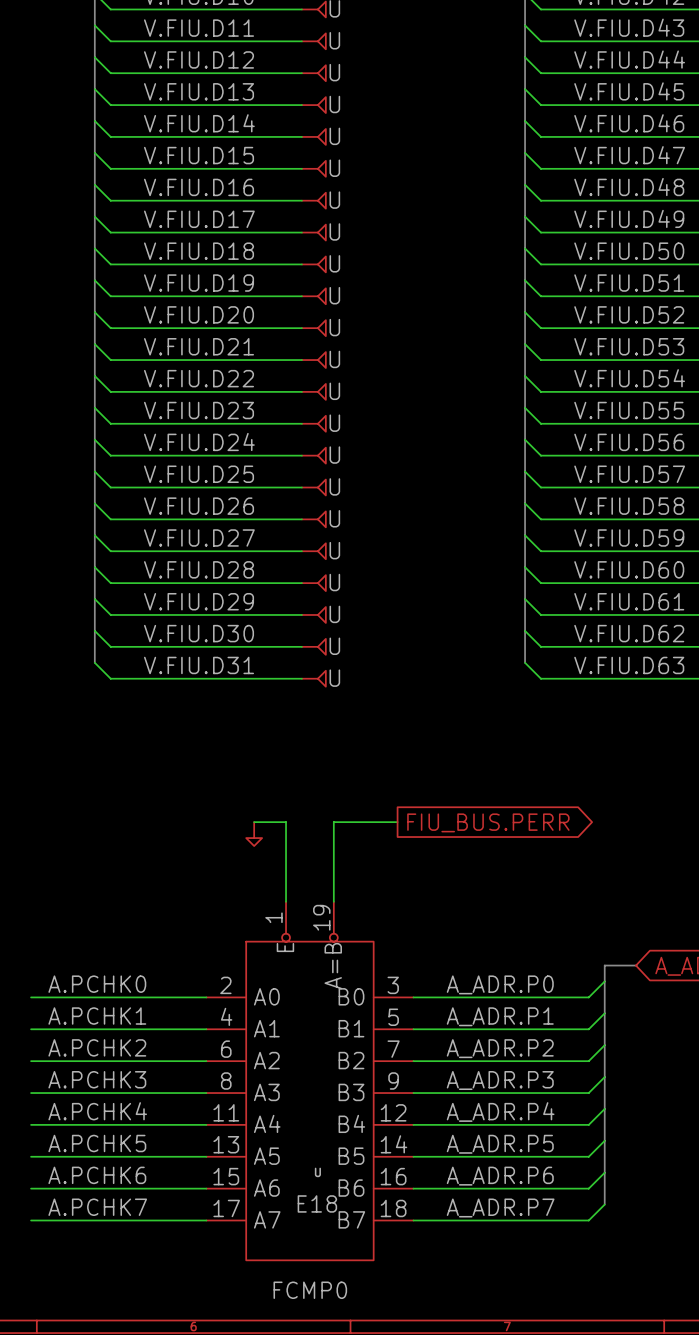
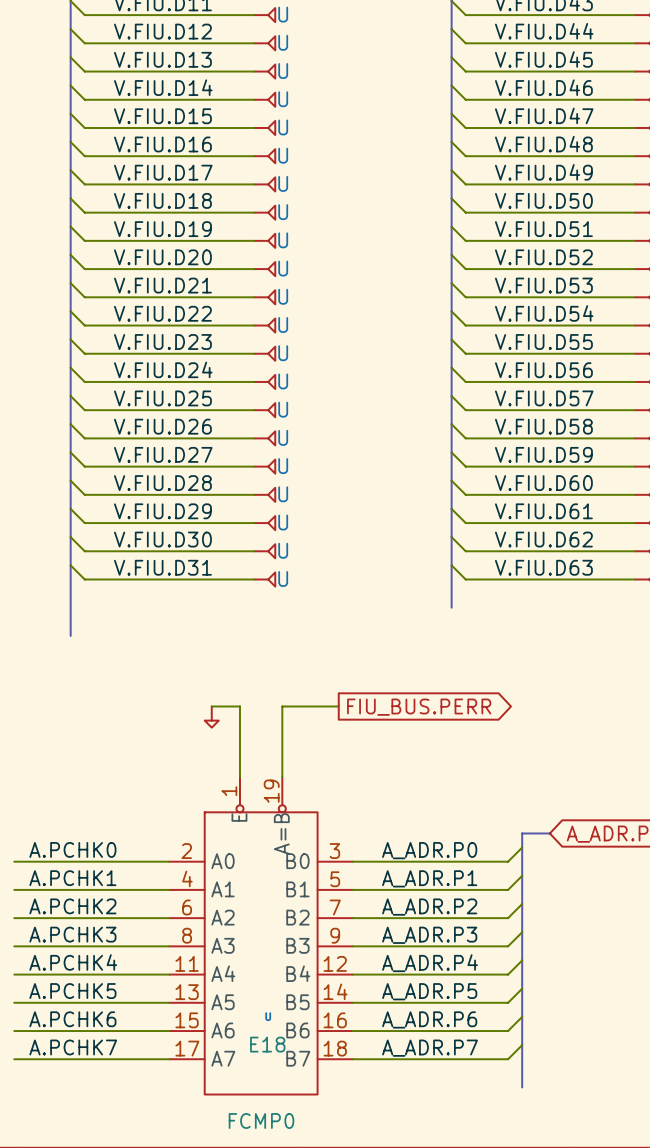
bus: none -> (70, 565) (70, 635)
bus: none -> (451, 565) (451, 607)
bus: none -> (522, 1045) (522, 1087)

